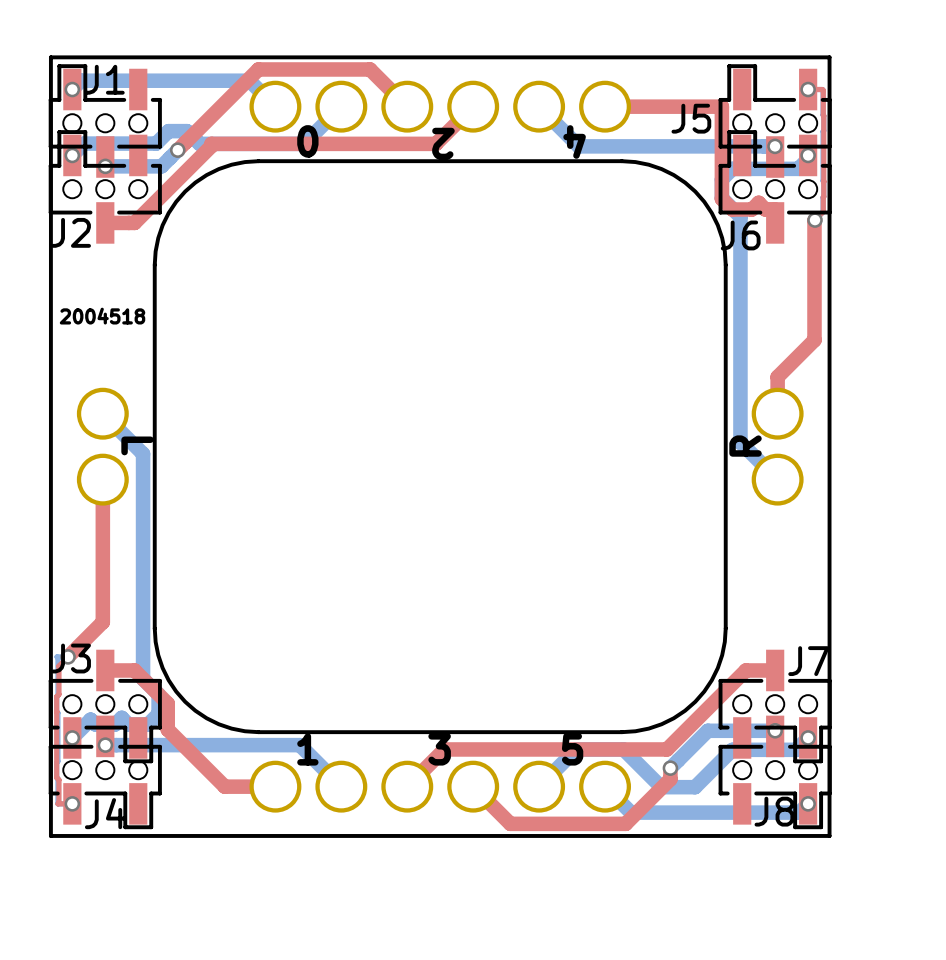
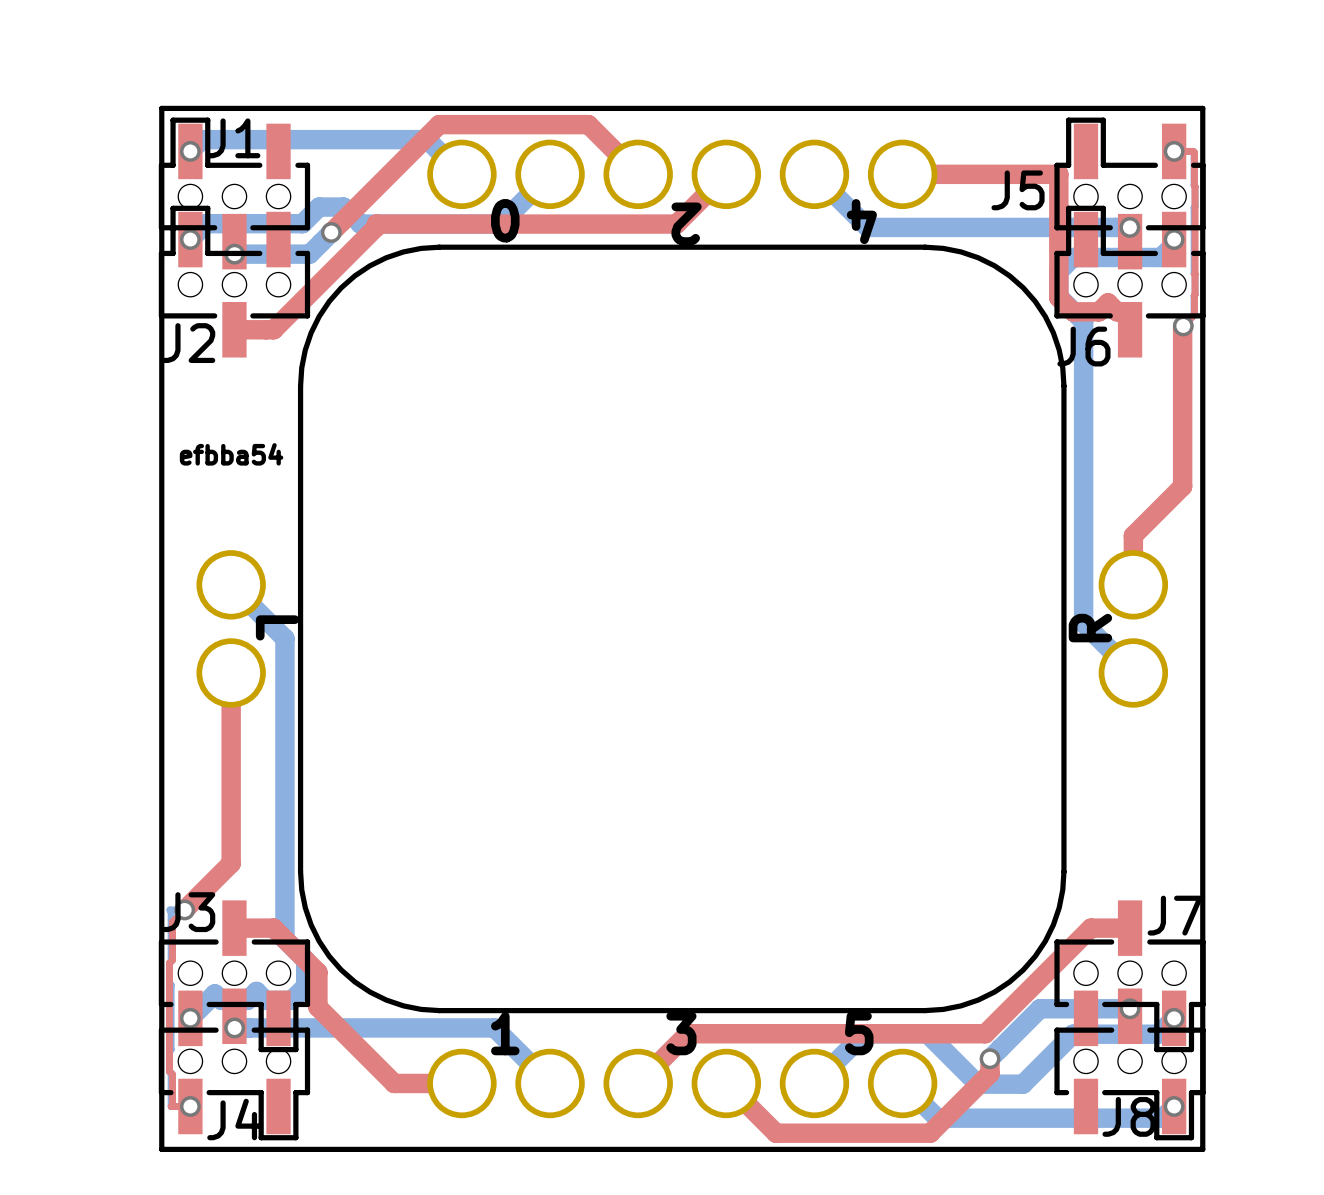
text: 2004518 (102, 316) -> efbba54 (231, 454)

